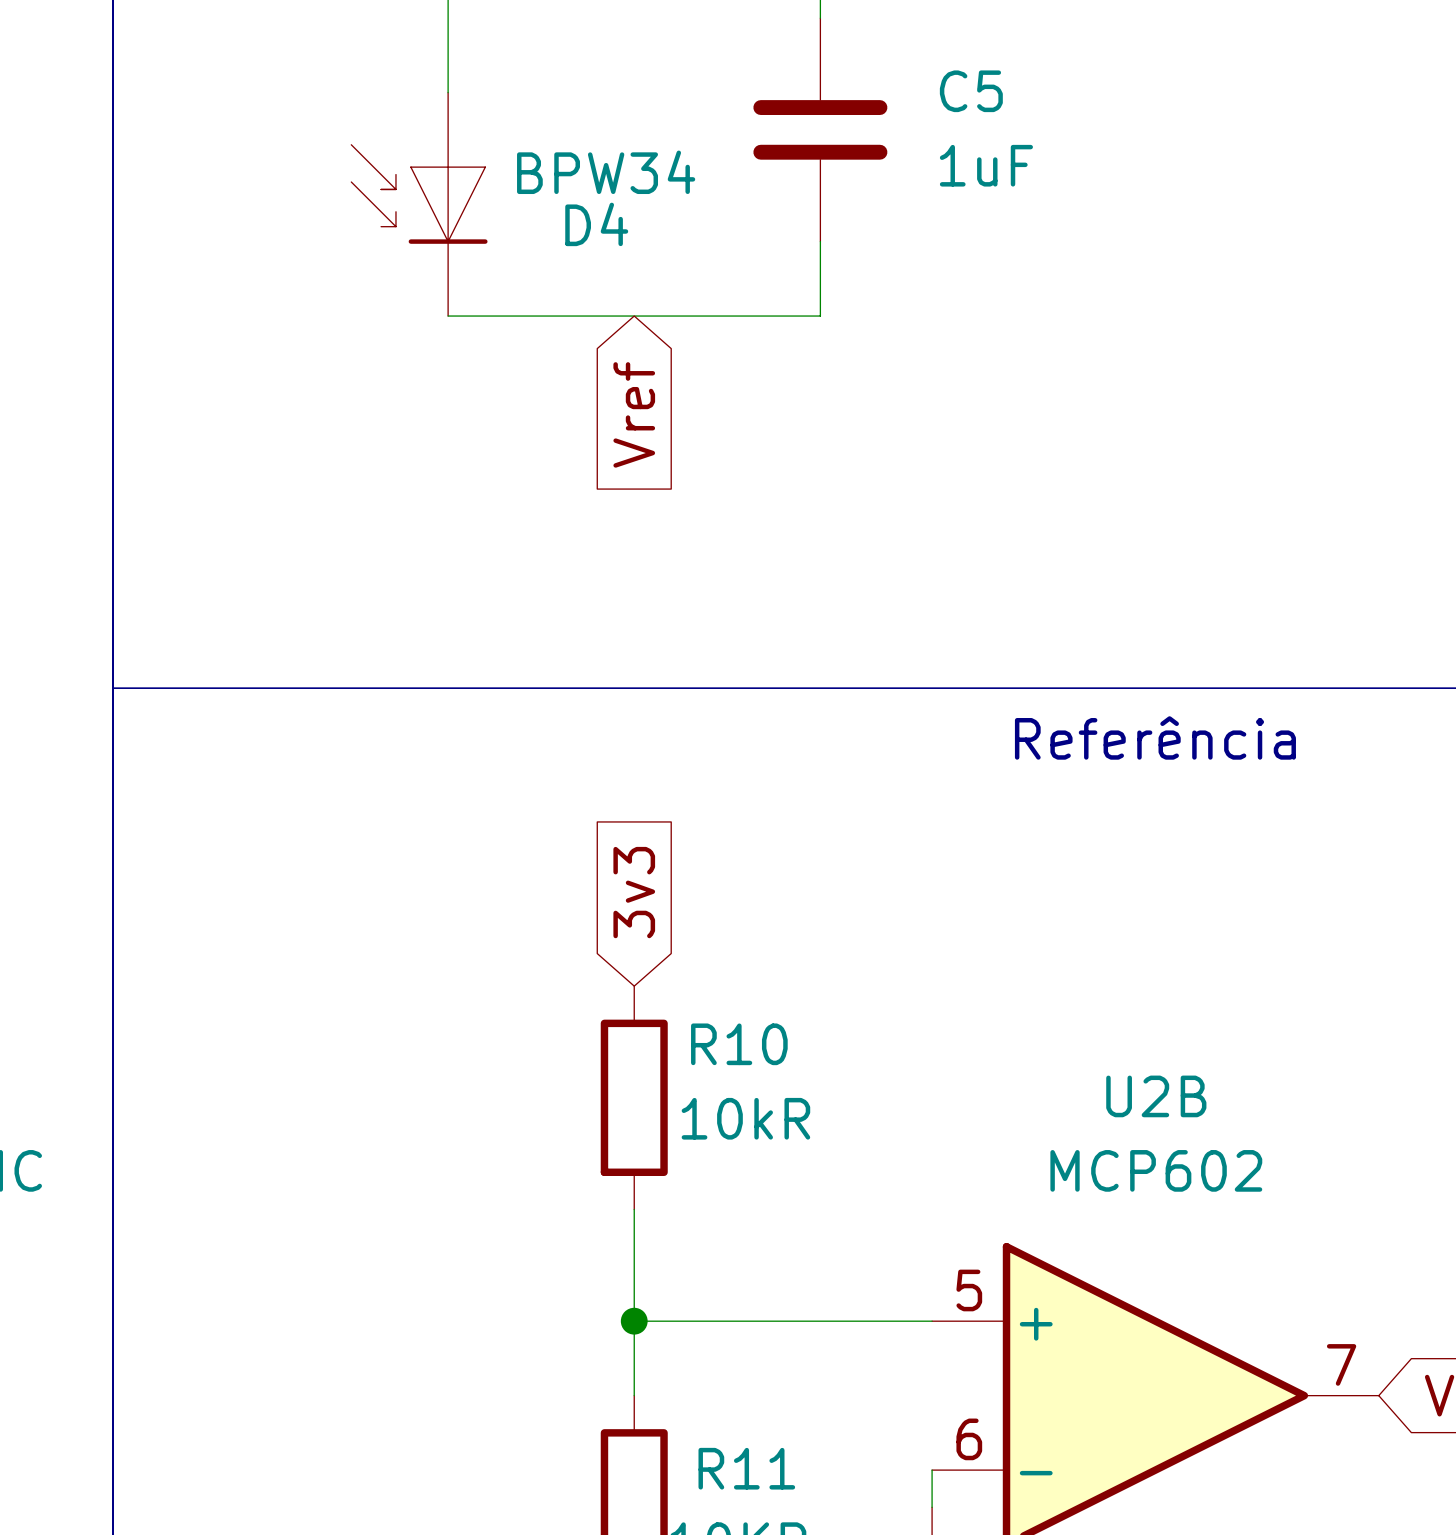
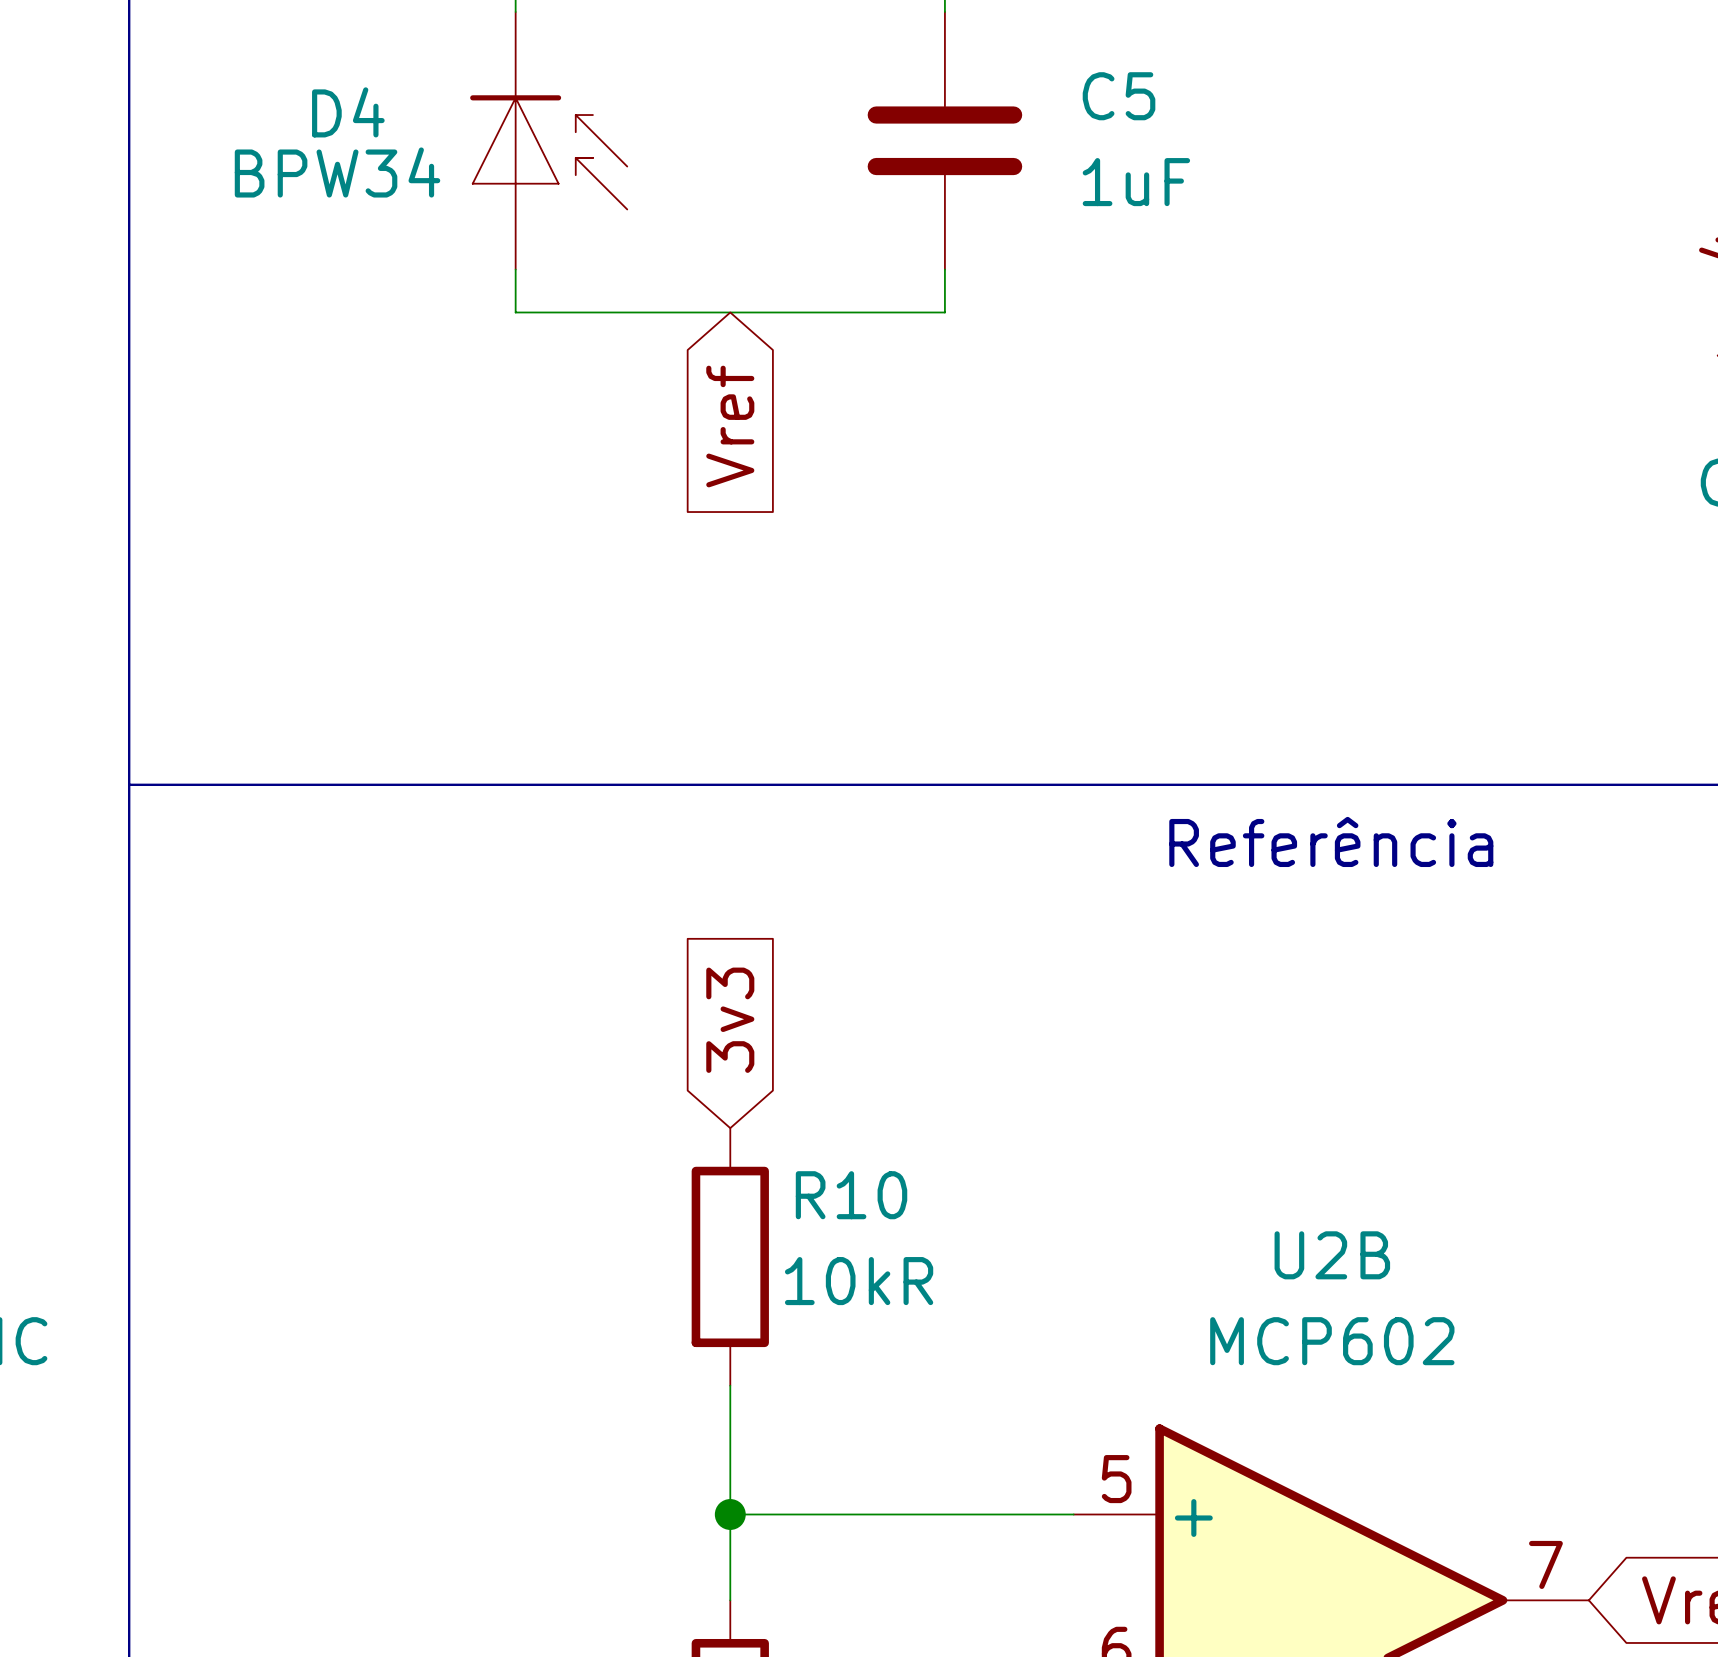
D4 rotation: 0° (419, 194) -> 180° (548, 152)
wire: (820, 278) (820, 316) (448, 316) -> (944, 312) (515, 312) (515, 269)
global label position: Vref (634, 414) -> Vref (730, 426)

